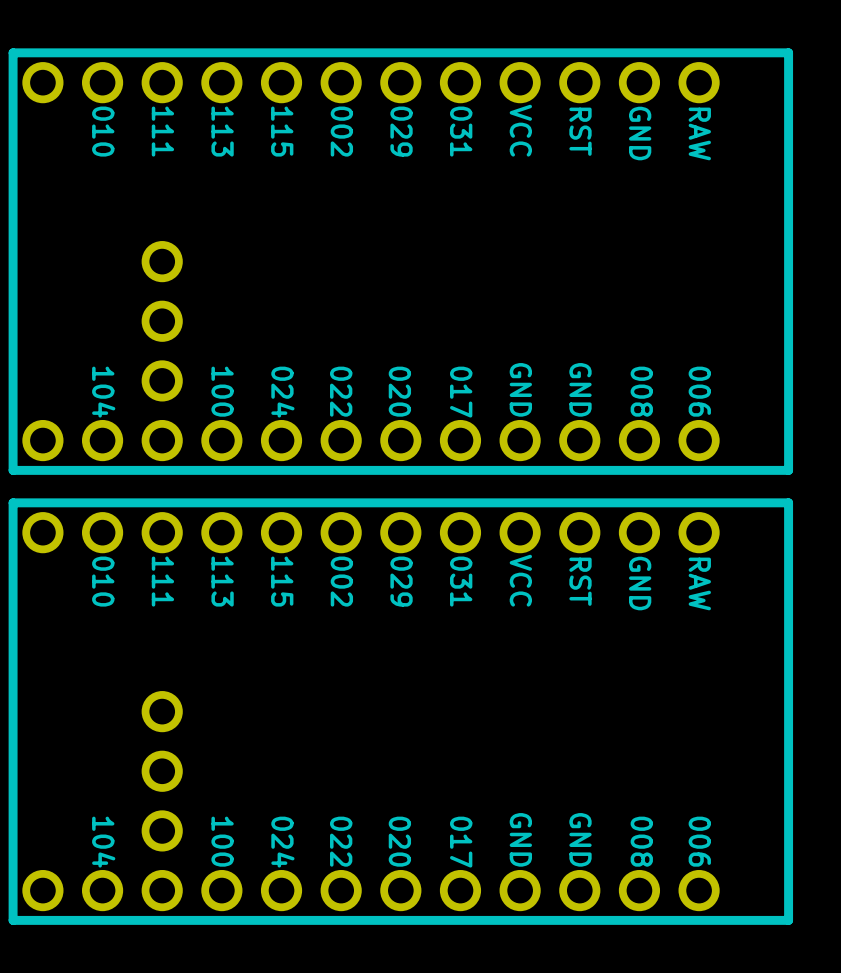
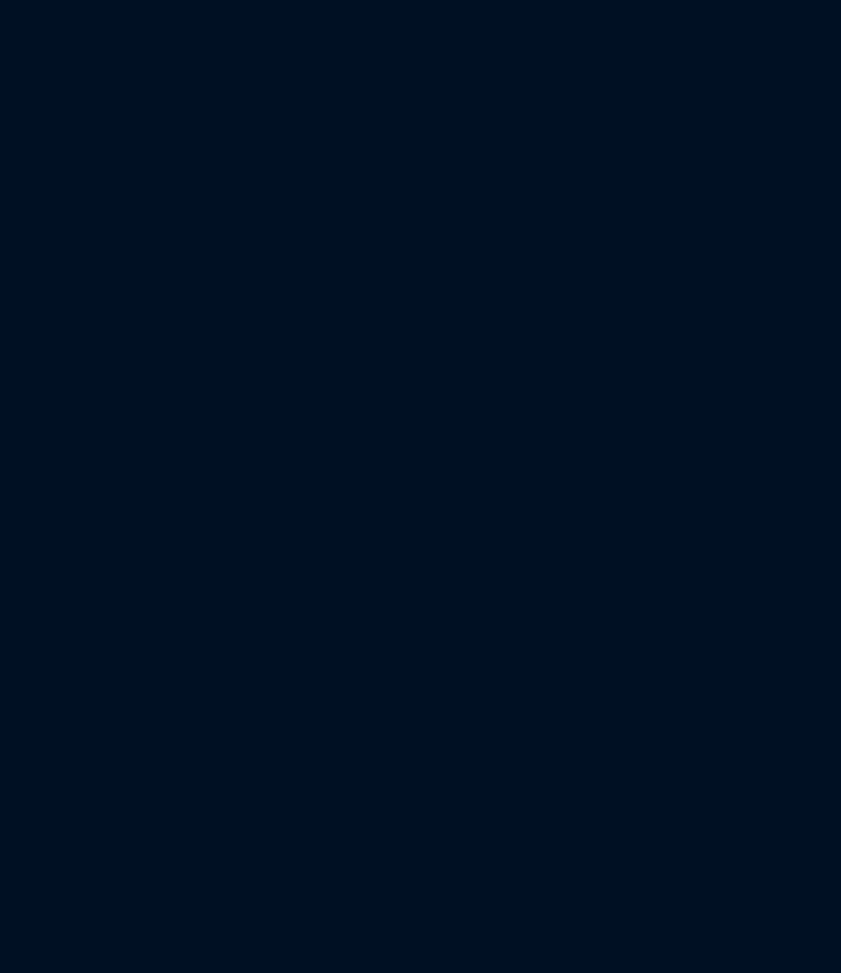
part: (400, 261) -> none
part: (400, 711) -> none

